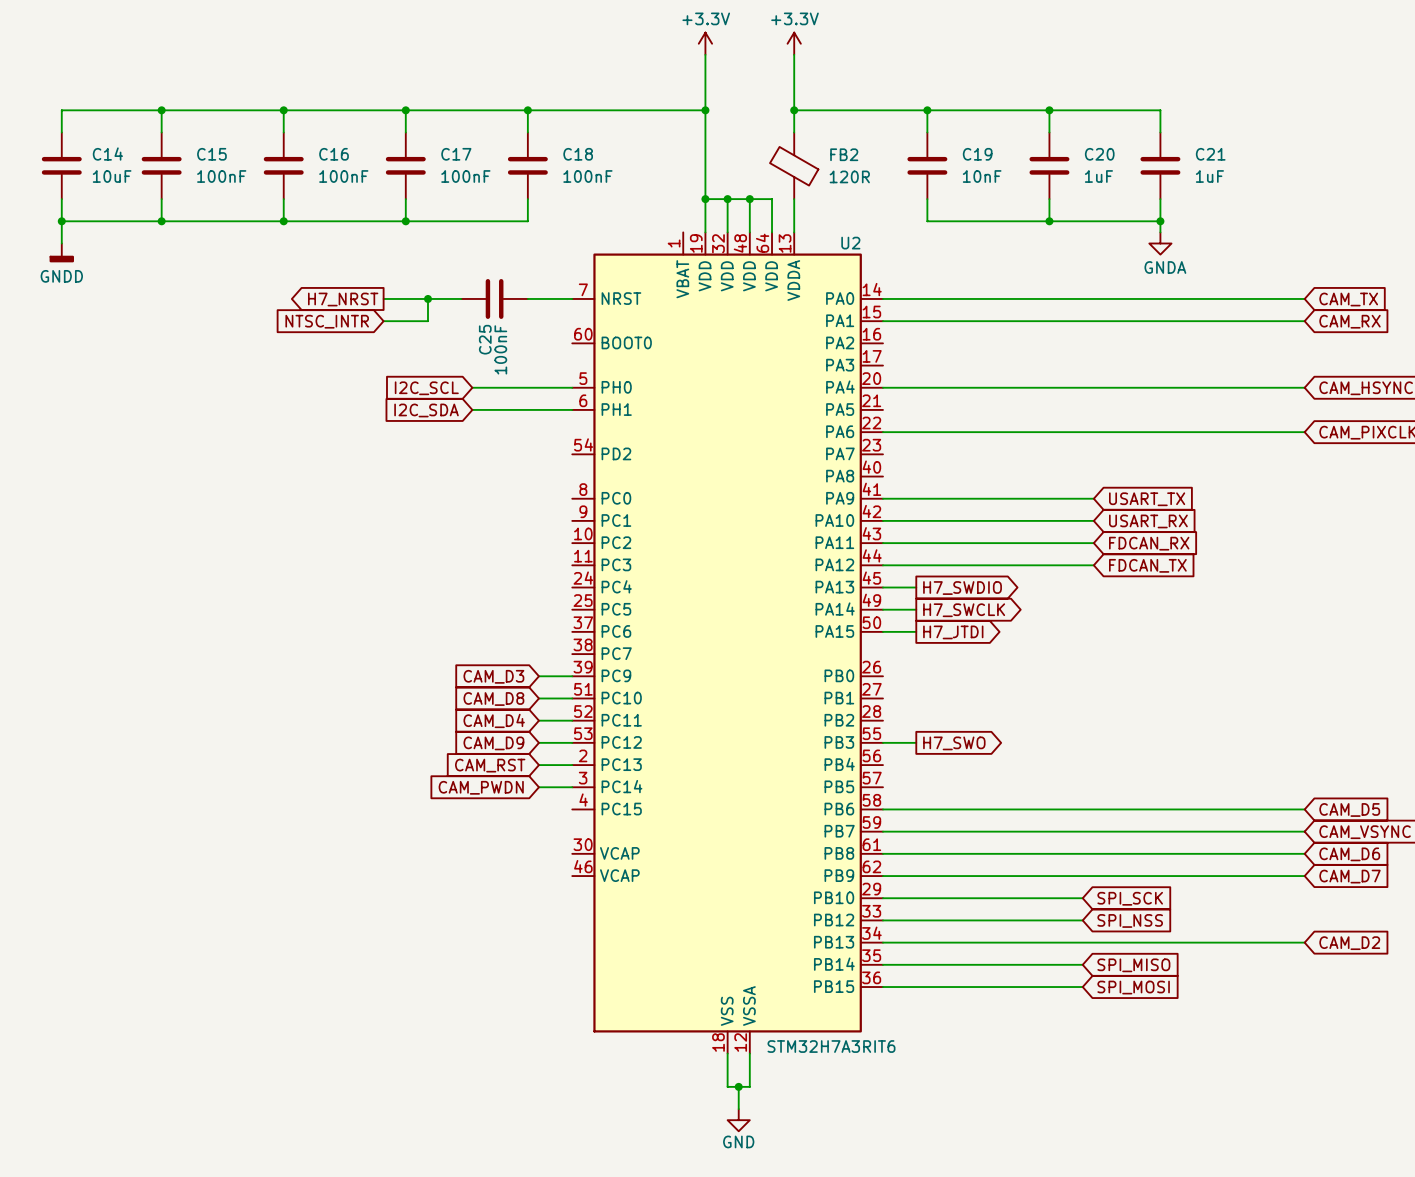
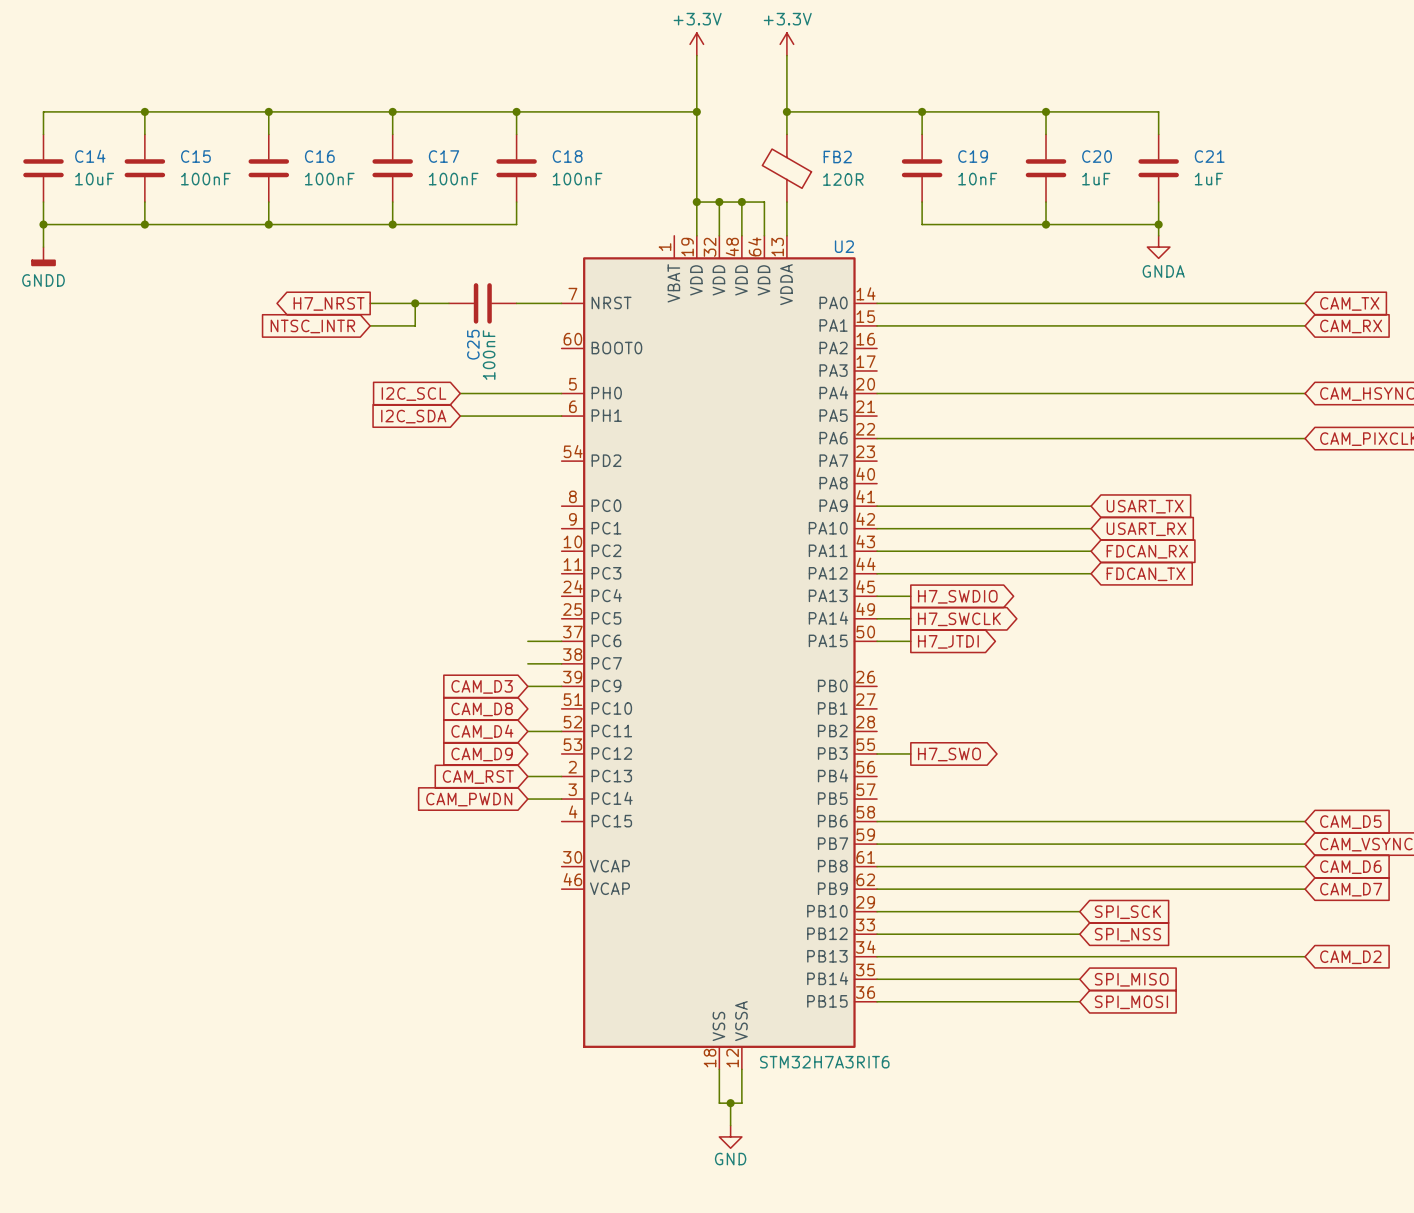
wire: (538, 698) (572, 698) -> (527, 663) (561, 663)
wire: (538, 742) (572, 742) -> (527, 641) (561, 641)

